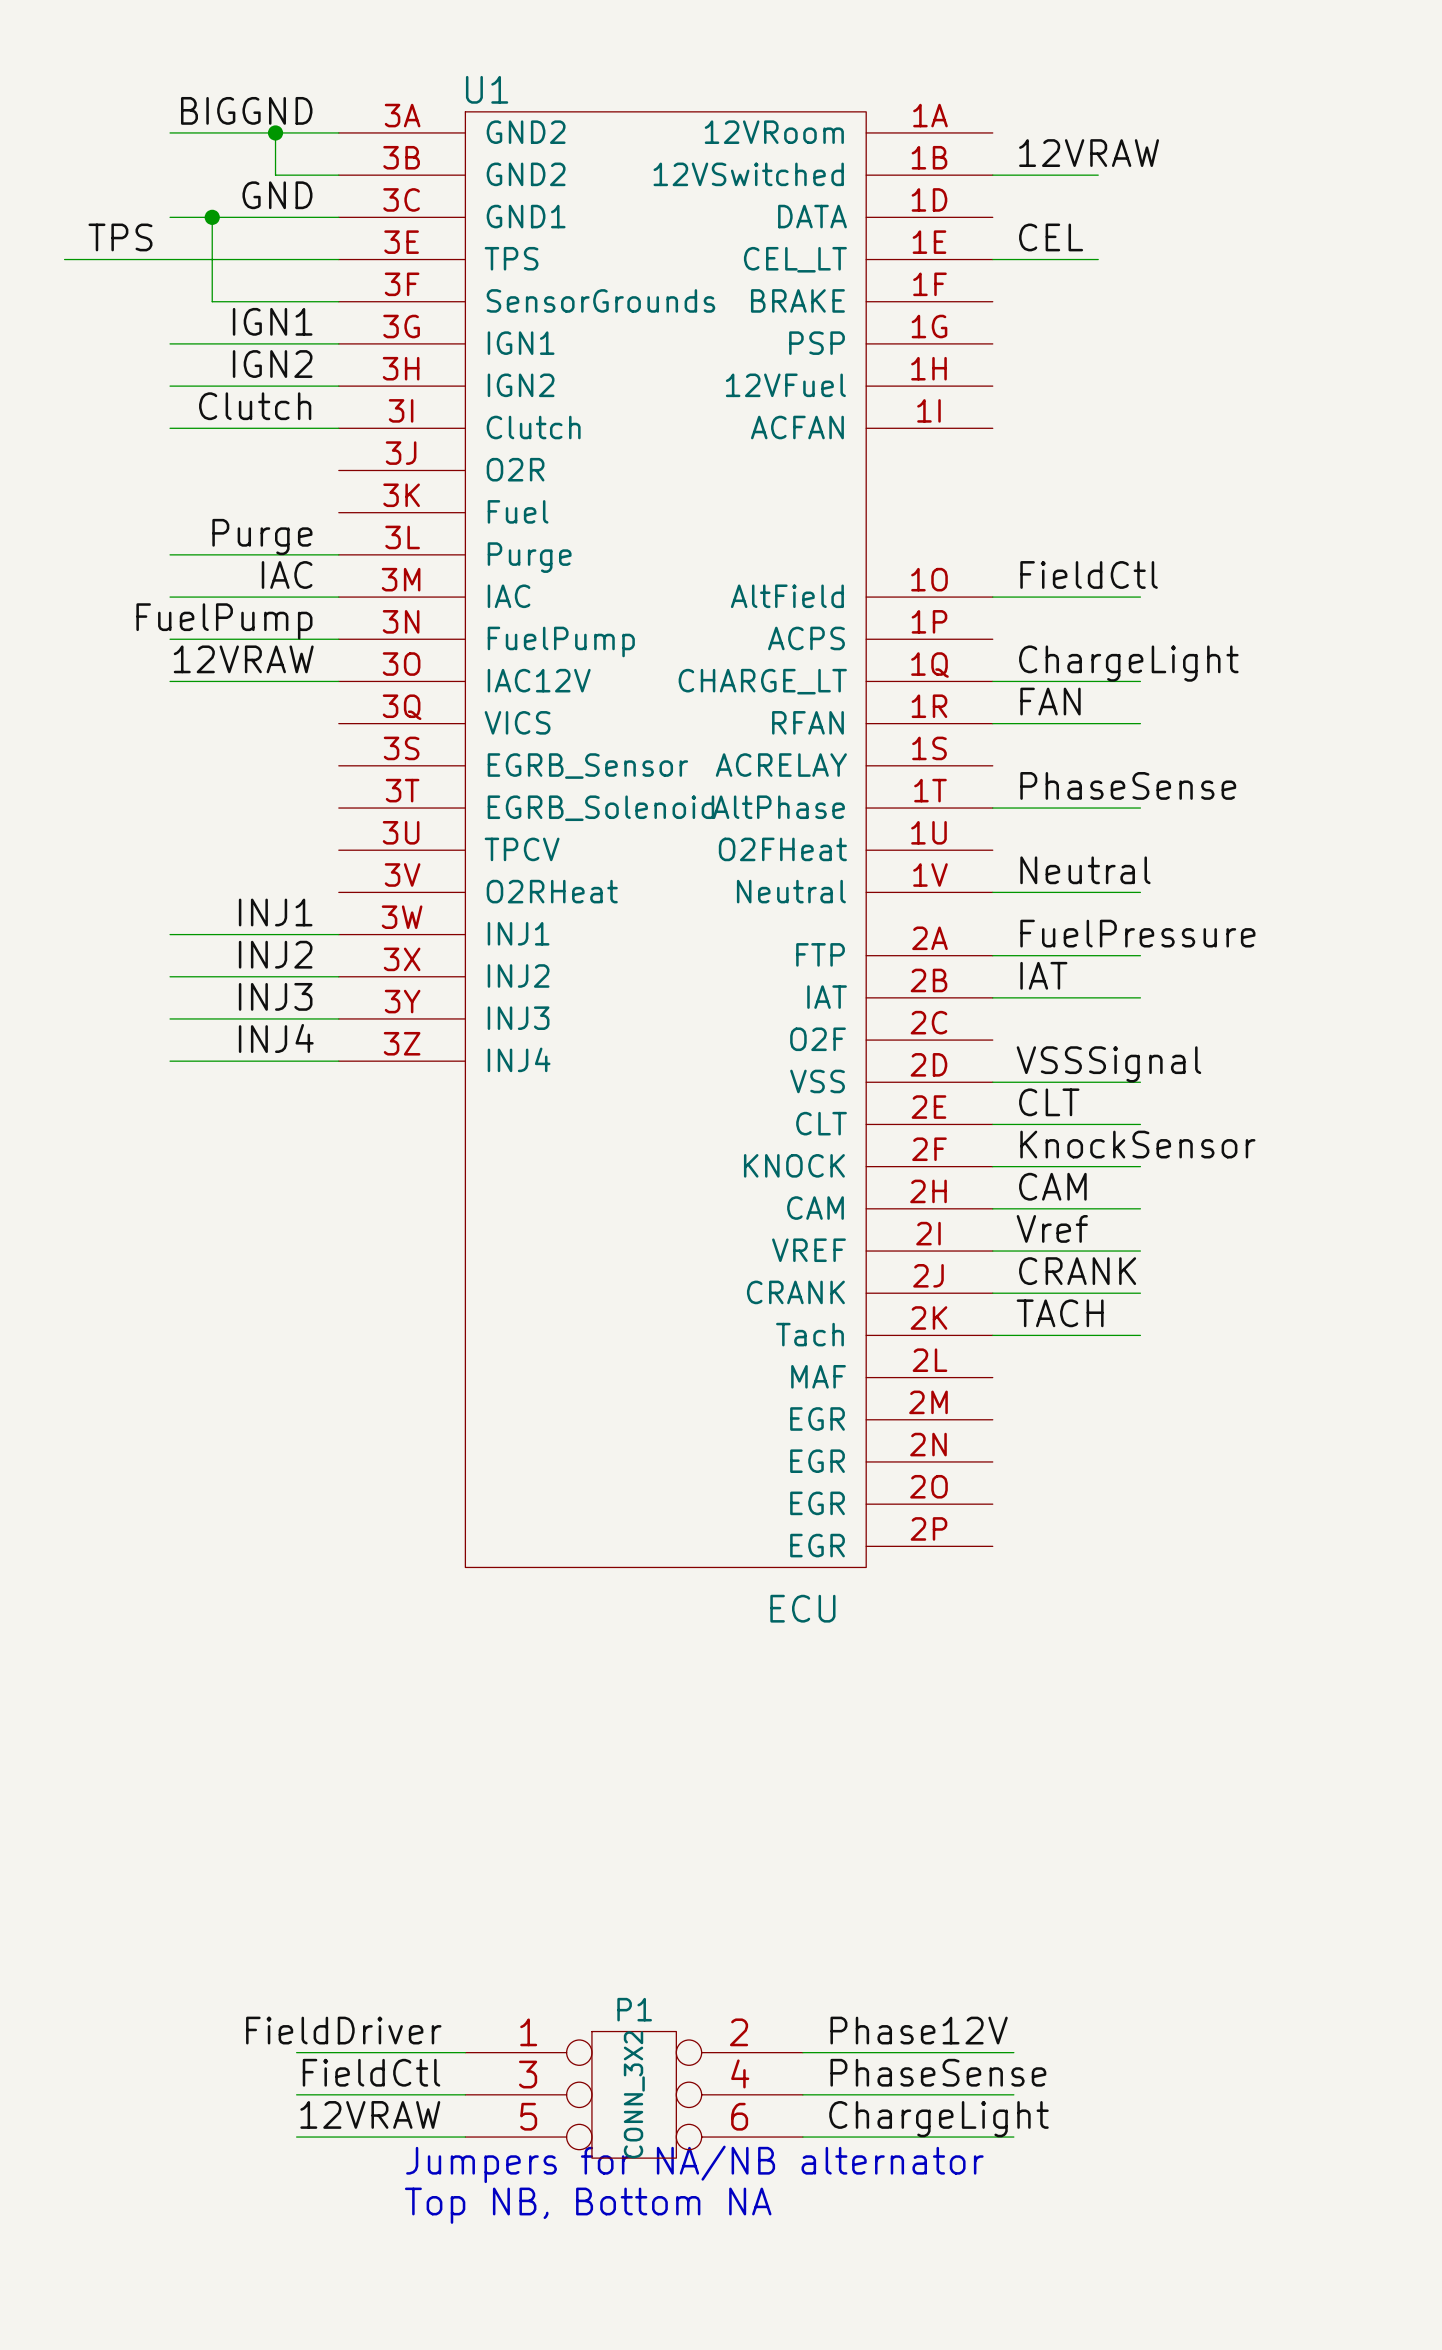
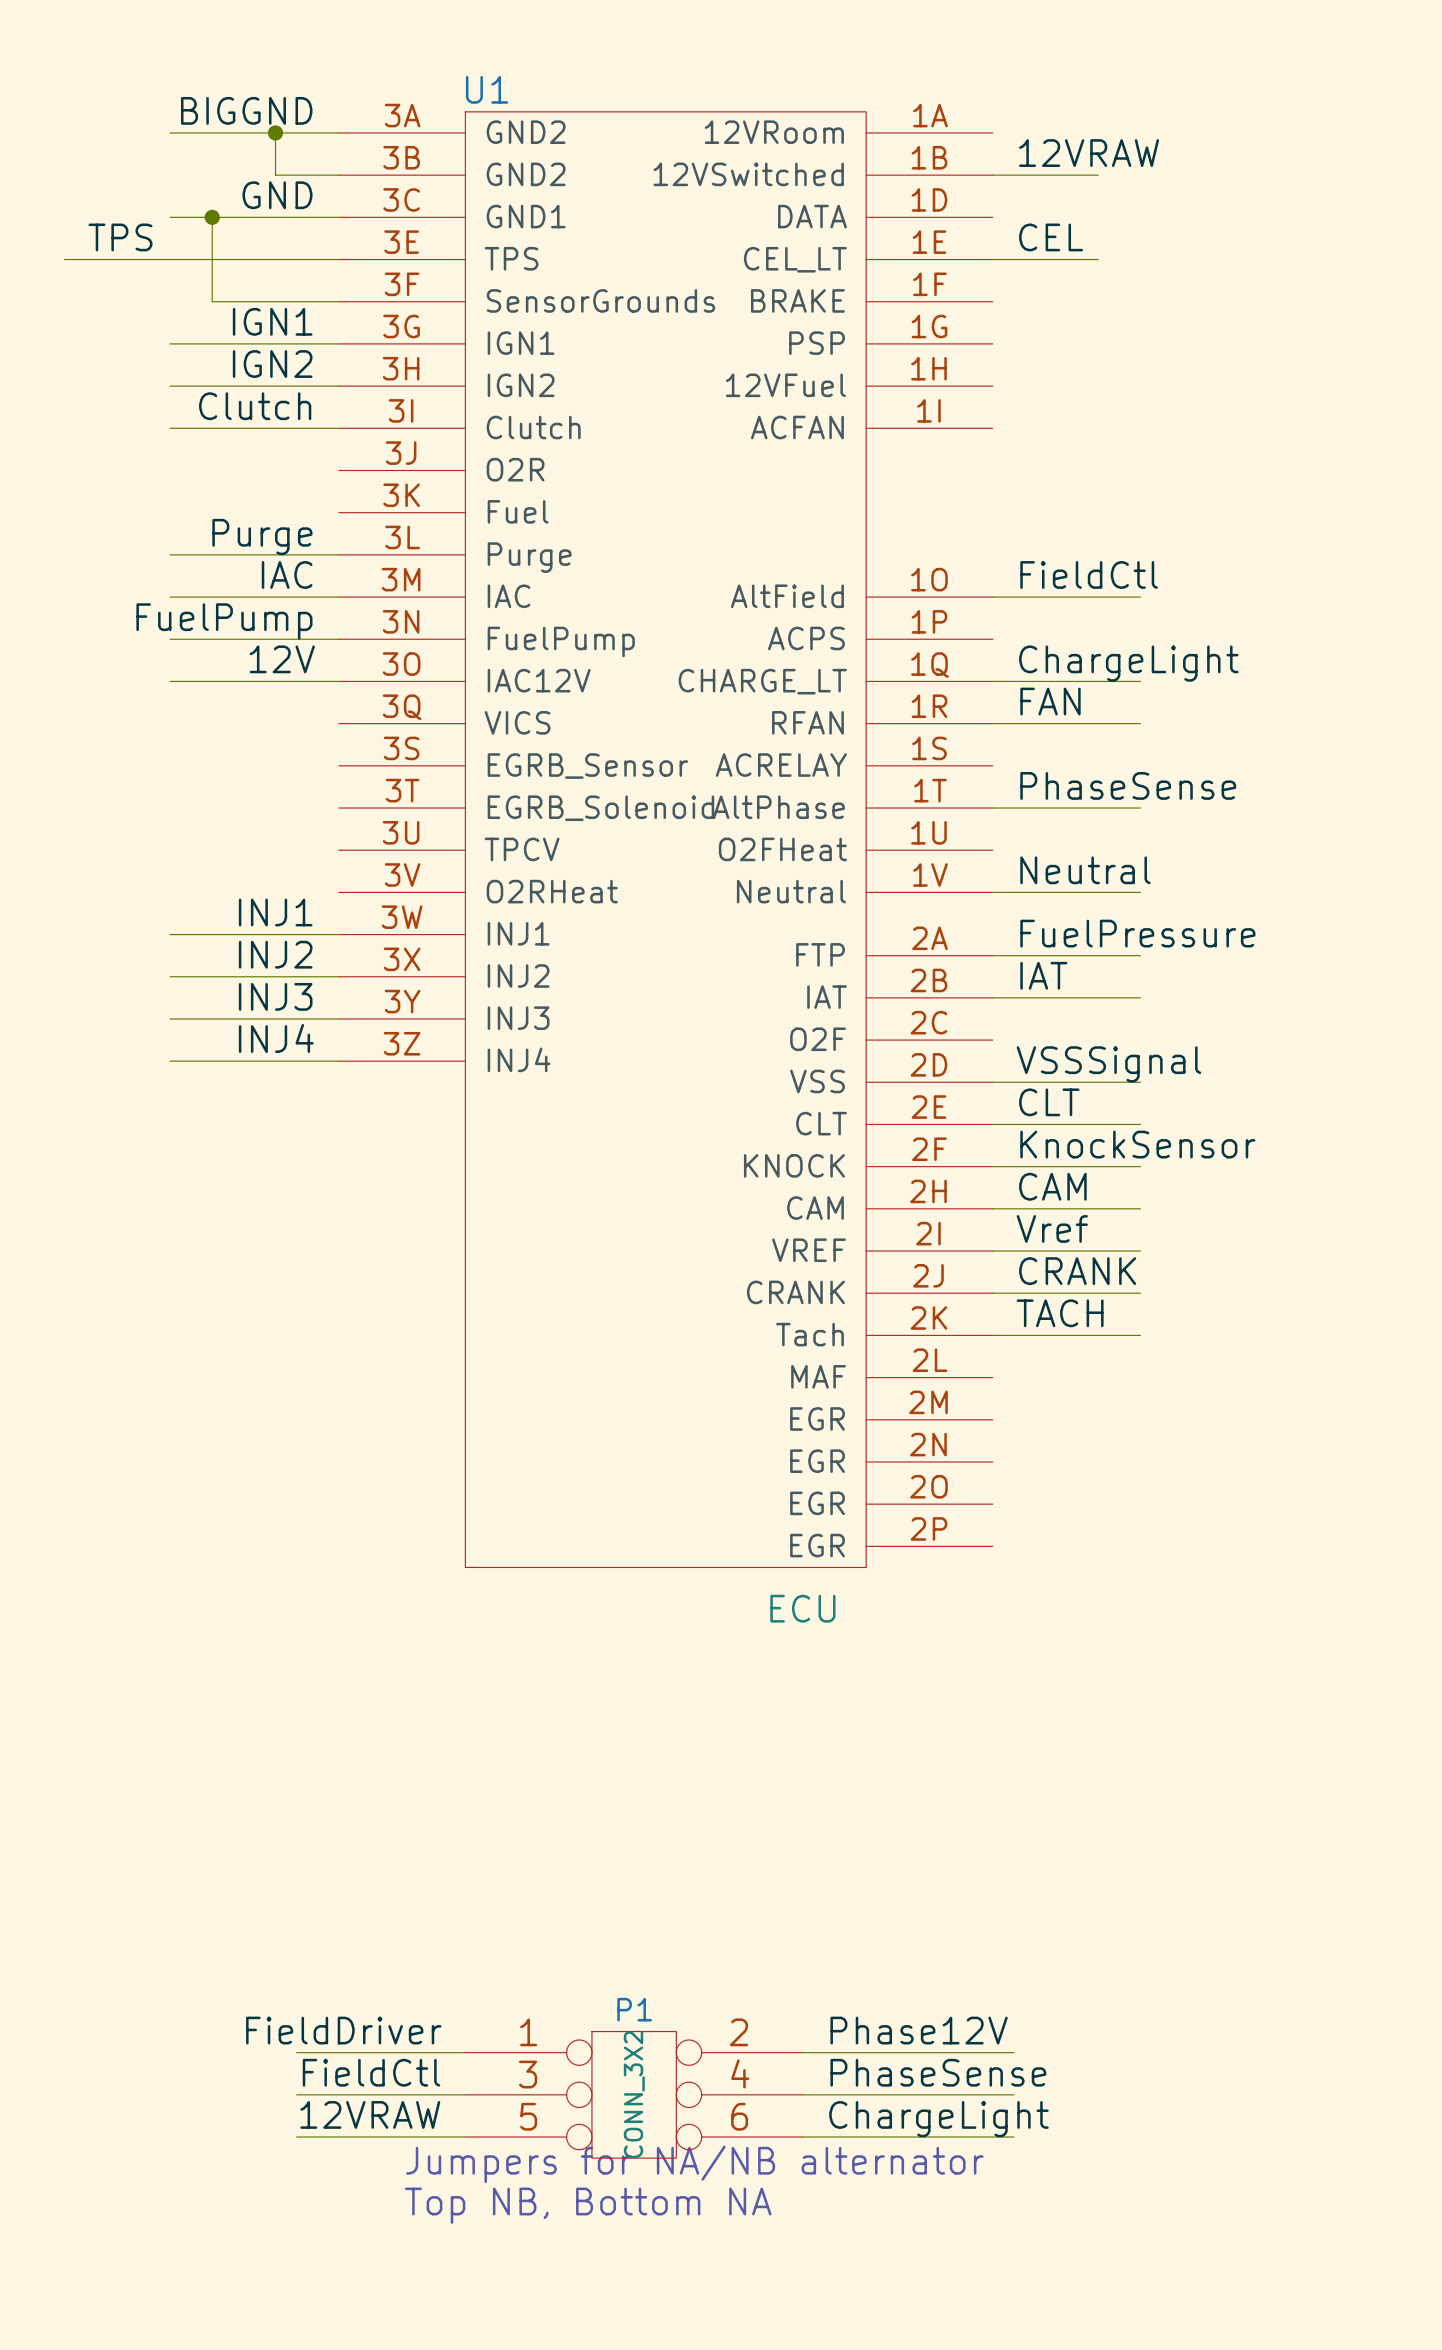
label: 12VRAW (243, 659) -> 12V (282, 659)

